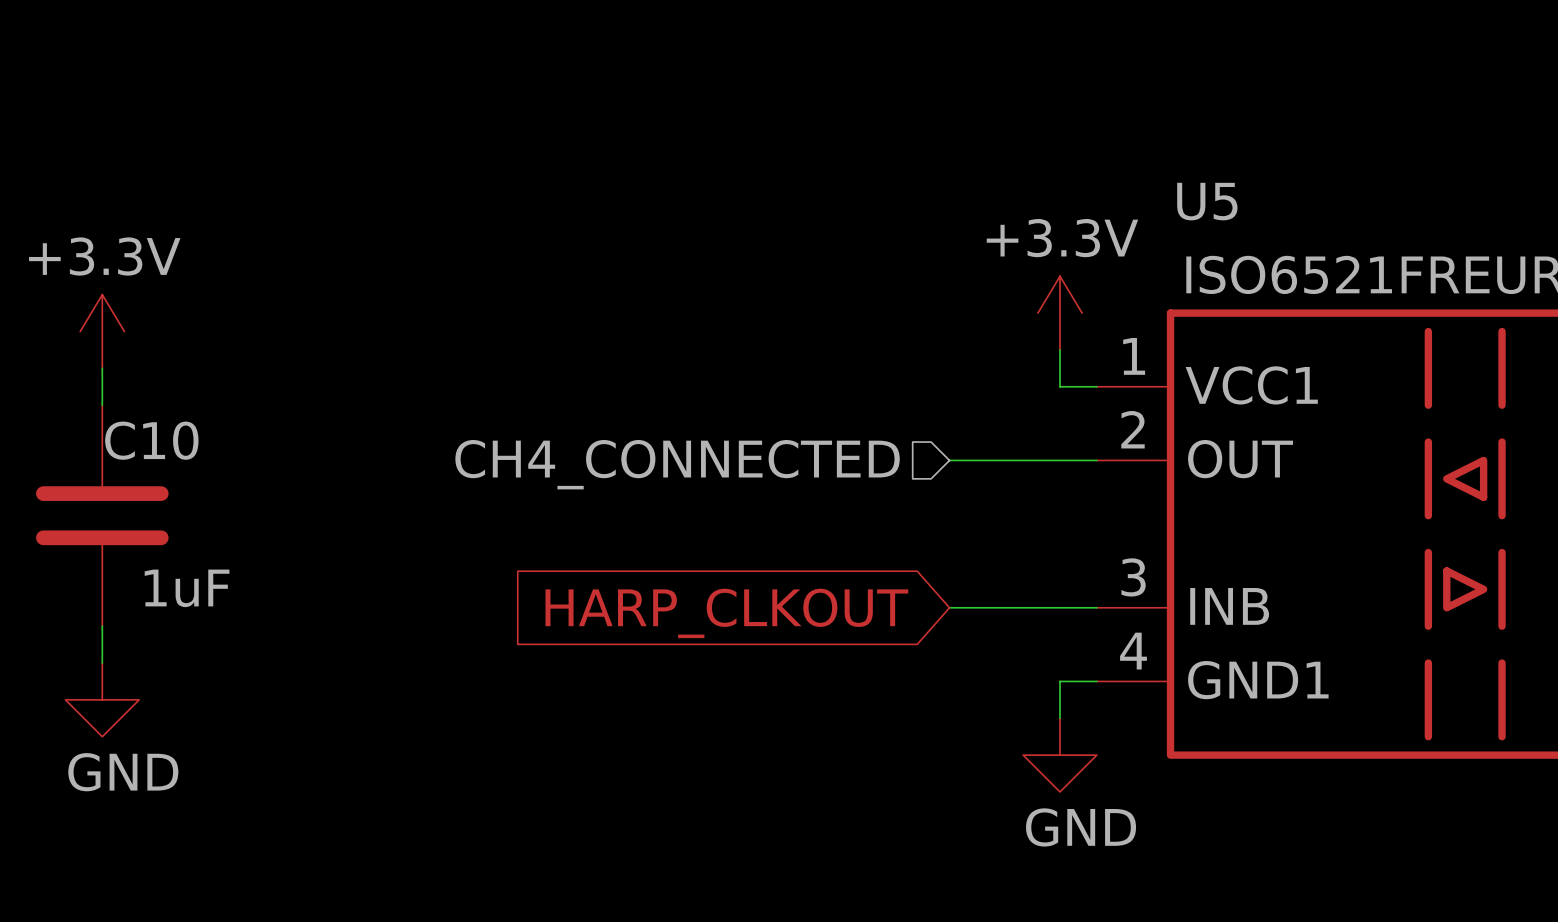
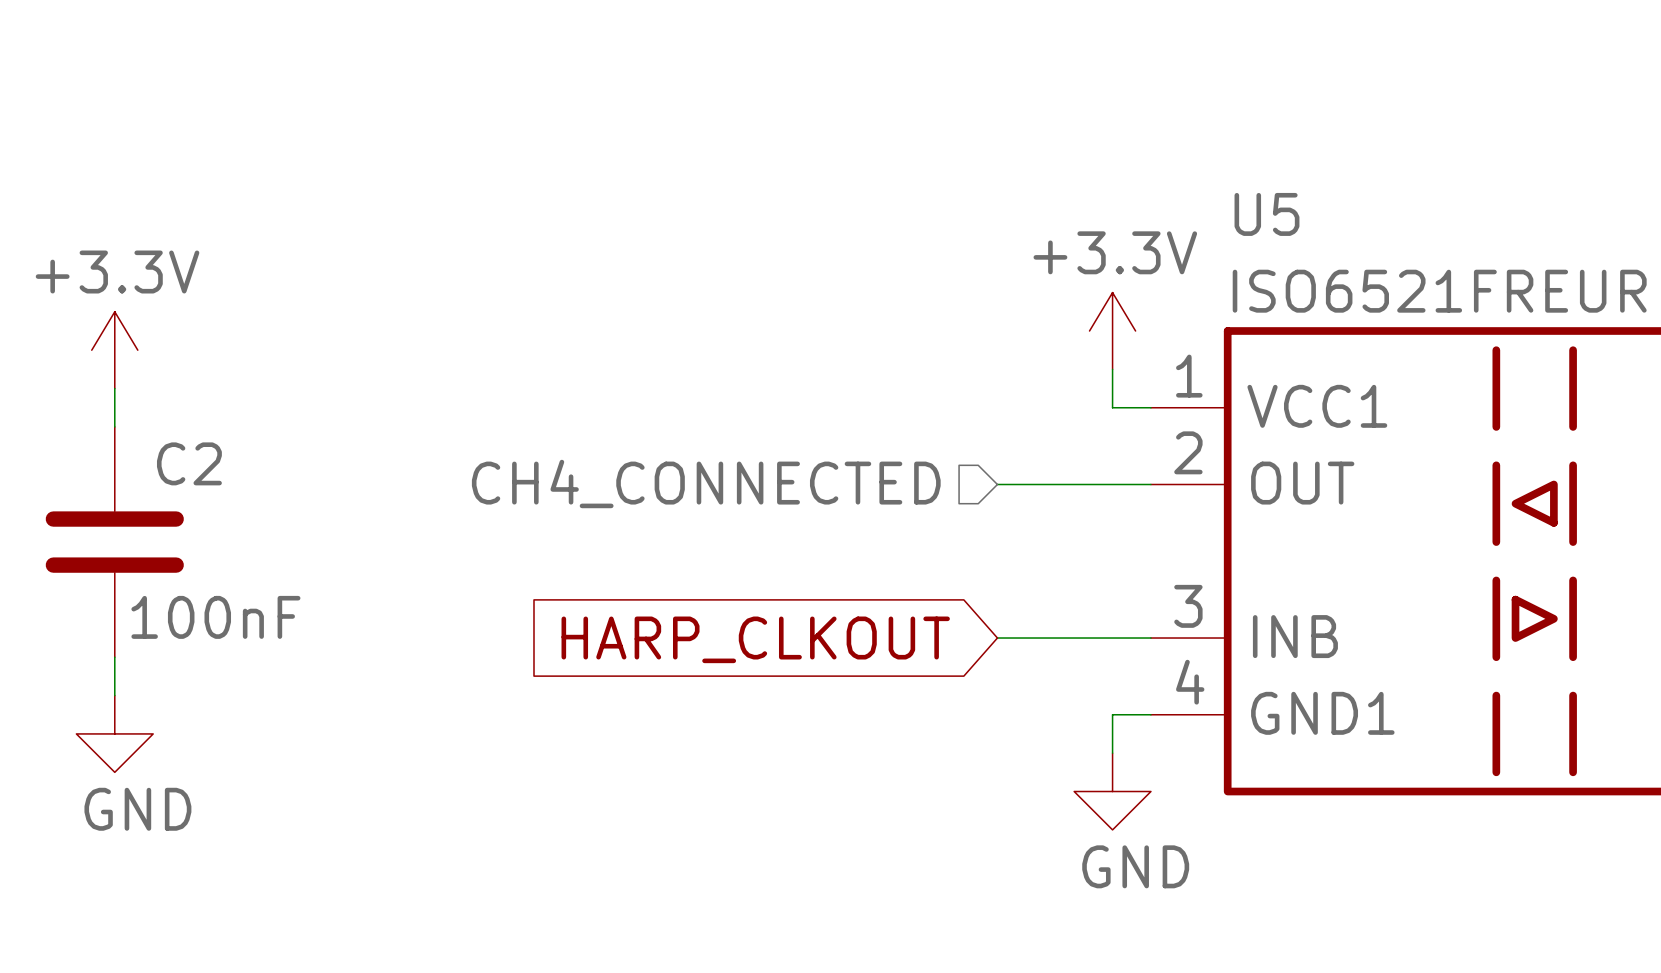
C10 name: C10 (151, 440) -> C2 (189, 463)
C10 value: 1uF (187, 588) -> 100nF (215, 617)

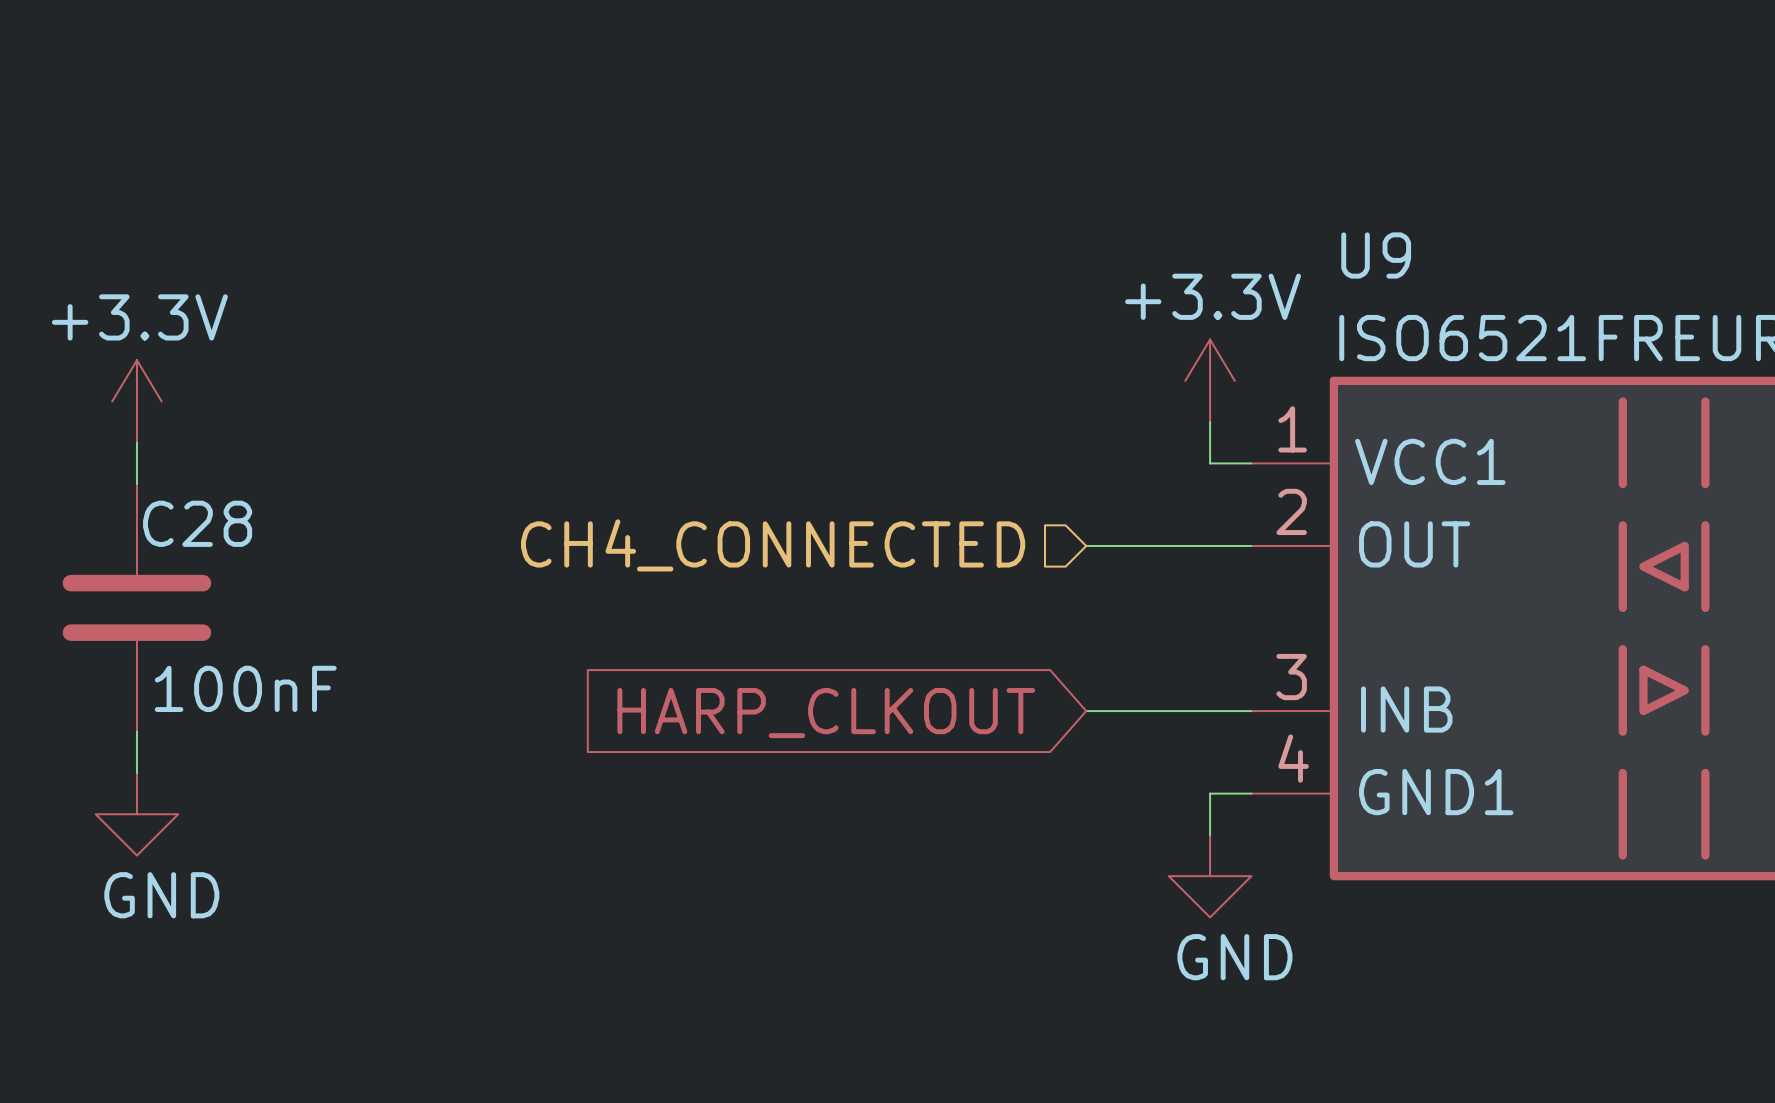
U5 name: U5 (1266, 214) -> U9 (1376, 255)
C2 name: C2 (189, 463) -> C28 (197, 523)

